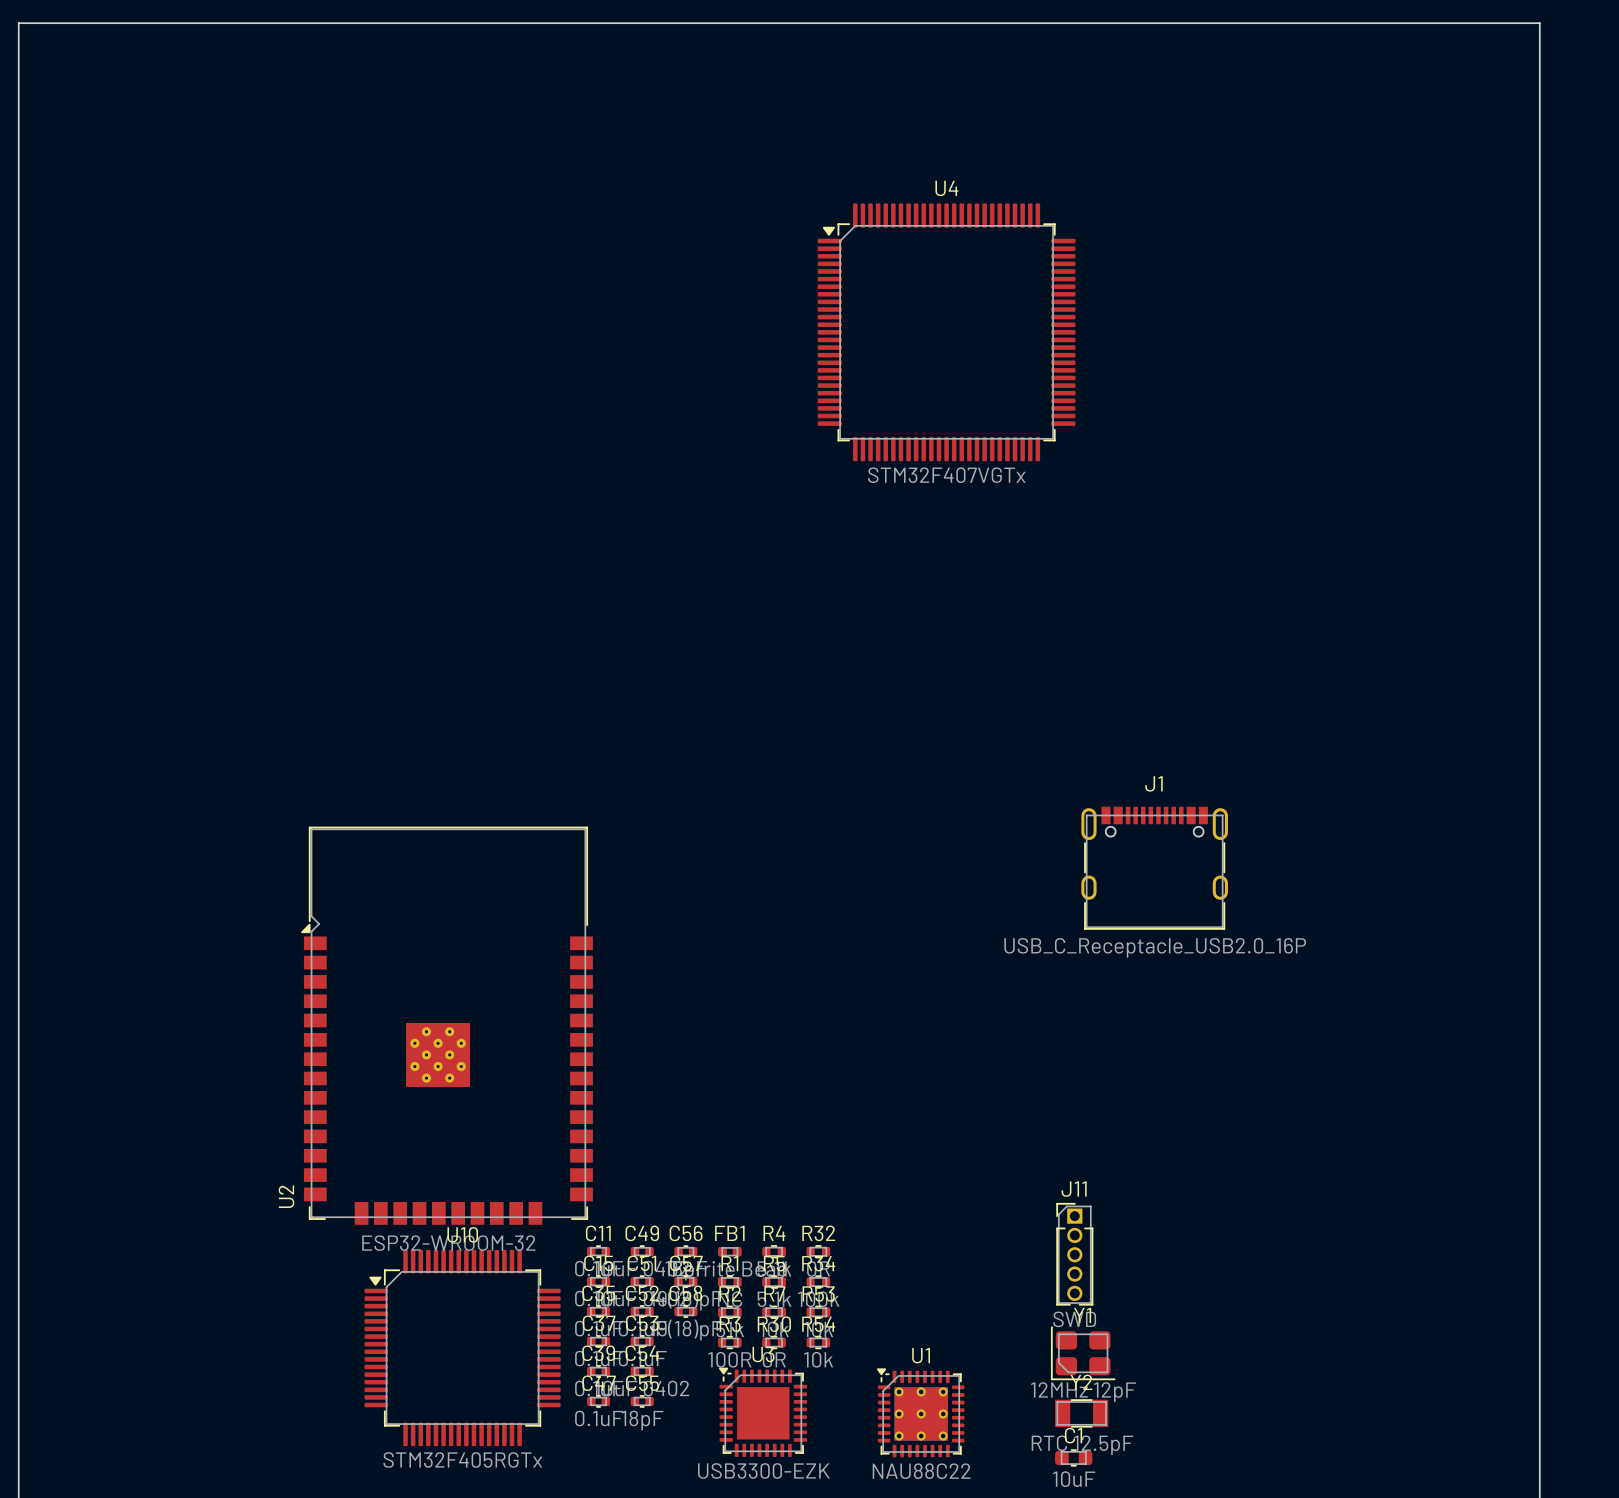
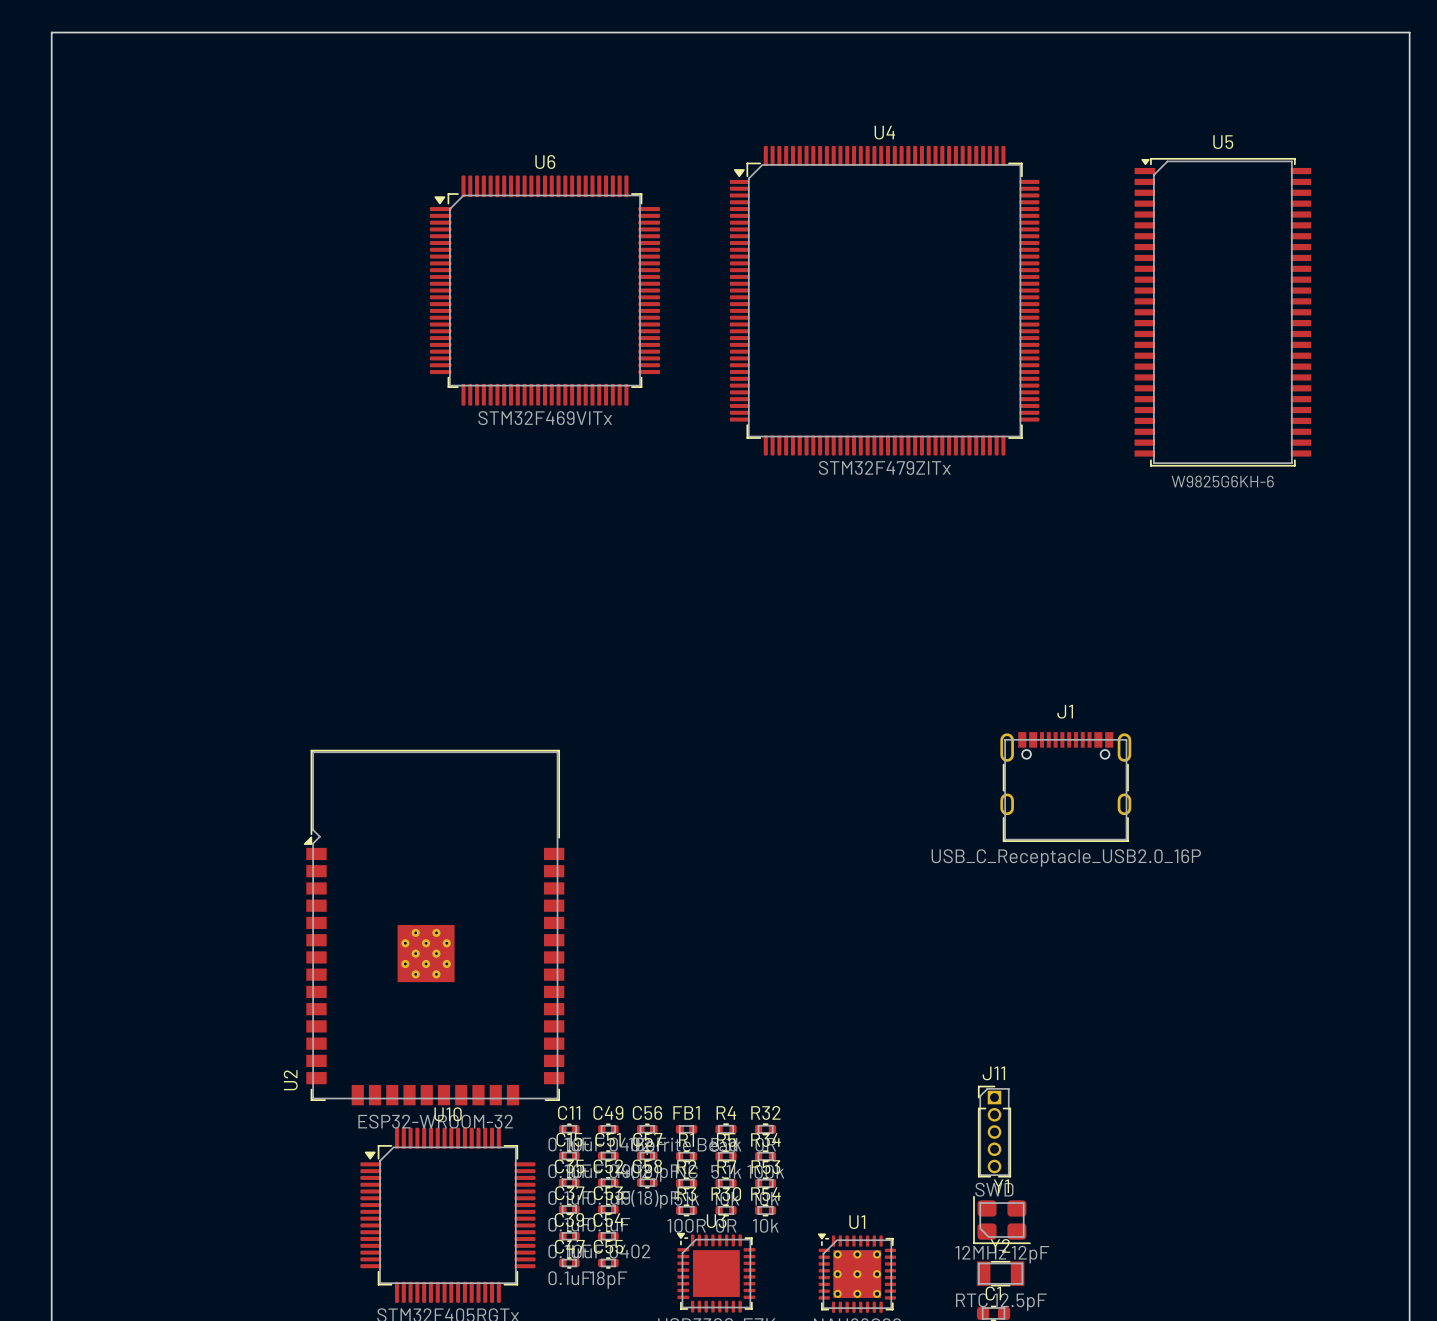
U4 name position: U4 (946, 188) -> U4 (884, 132)
U4 footprint: [817, 203, 1076, 462] -> [729, 145, 1040, 456]
U6: none -> STM32F469VITx (544, 290)
U5: none -> W9825G6KH-6 (1222, 312)
U4 value: STM32F407VGTx (946, 475) -> STM32F479ZITx (884, 467)

